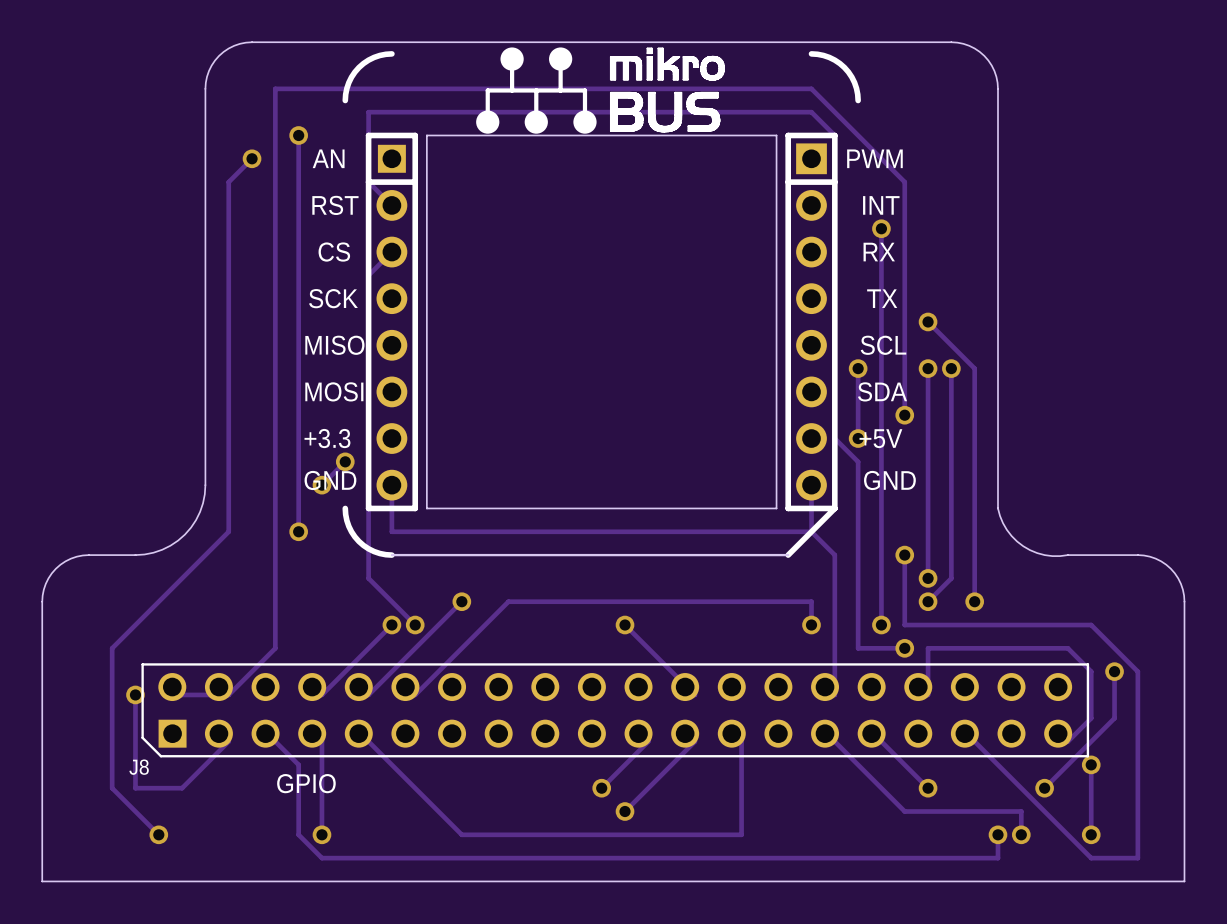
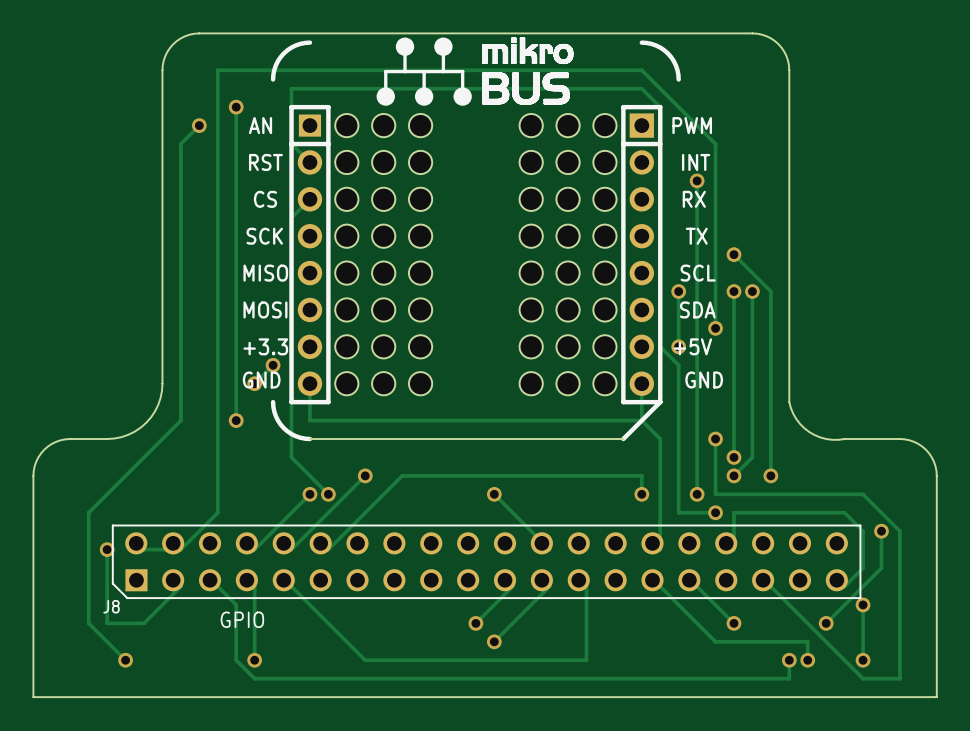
board edge: (426, 135) (776, 135) (776, 508) (426, 508) (426, 135) -> none
hole: none -> (346, 125)
hole: none -> (383, 125)
hole: none -> (420, 125)
hole: none -> (531, 125)
hole: none -> (568, 125)
hole: none -> (604, 125)
hole: none -> (346, 162)
hole: none -> (383, 162)
hole: none -> (420, 162)
hole: none -> (531, 162)
hole: none -> (568, 162)
hole: none -> (604, 162)
hole: none -> (346, 199)
hole: none -> (383, 199)
hole: none -> (420, 199)
hole: none -> (531, 199)
hole: none -> (568, 199)
hole: none -> (604, 199)
hole: none -> (346, 236)
hole: none -> (383, 236)
hole: none -> (420, 236)
hole: none -> (531, 236)
hole: none -> (568, 236)
hole: none -> (604, 236)
hole: none -> (346, 273)
hole: none -> (383, 273)
hole: none -> (420, 273)
hole: none -> (531, 273)
hole: none -> (568, 273)
hole: none -> (604, 273)
hole: none -> (346, 309)
hole: none -> (383, 309)
hole: none -> (420, 309)
hole: none -> (531, 309)
hole: none -> (568, 309)
hole: none -> (604, 309)
hole: none -> (346, 346)
hole: none -> (383, 346)
hole: none -> (420, 346)
hole: none -> (531, 346)
hole: none -> (568, 346)
hole: none -> (604, 346)
hole: none -> (346, 383)
hole: none -> (383, 383)
hole: none -> (420, 383)
hole: none -> (531, 383)
hole: none -> (568, 383)
hole: none -> (604, 383)

